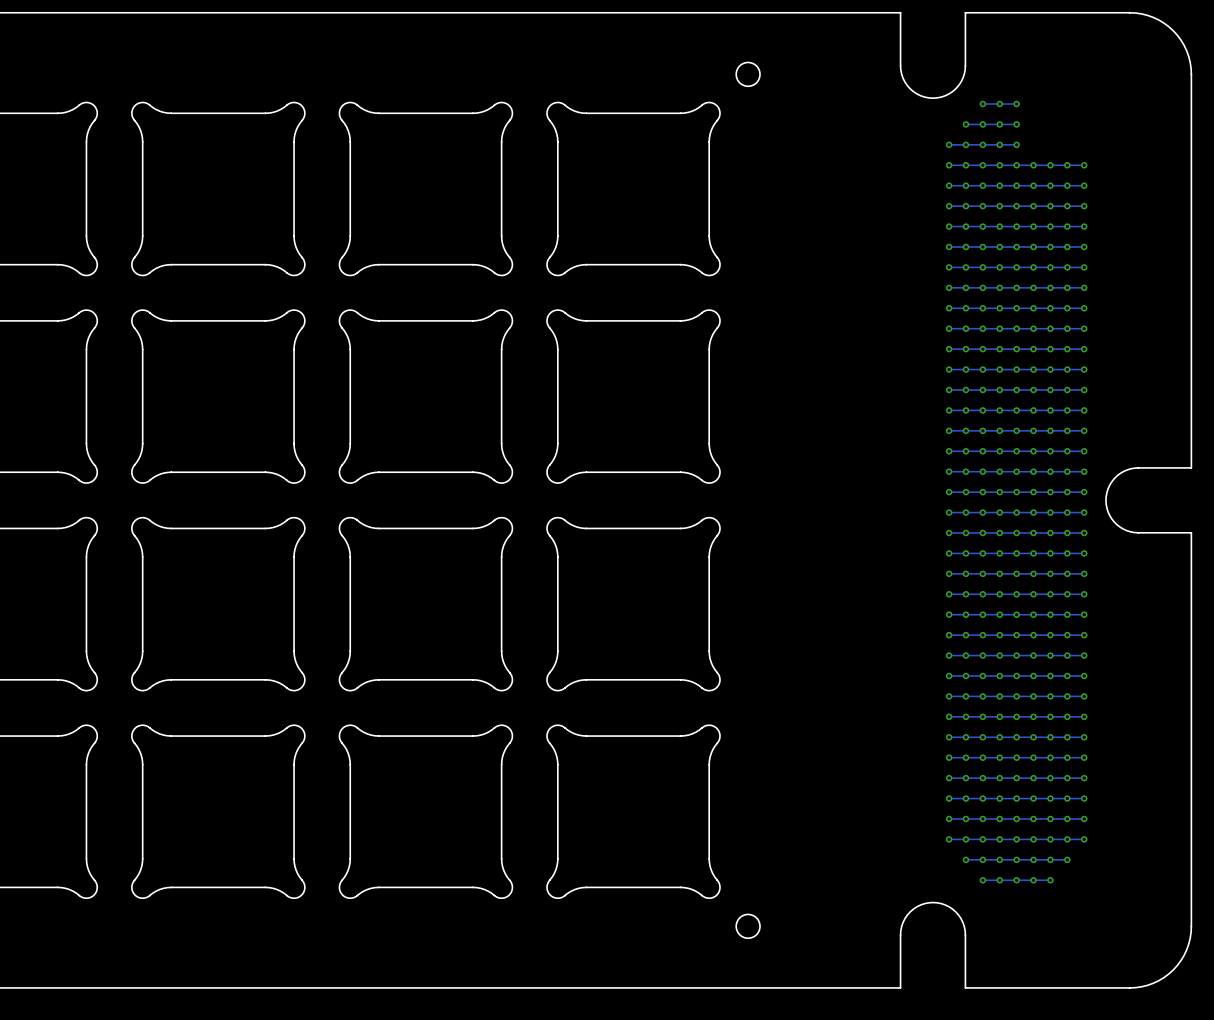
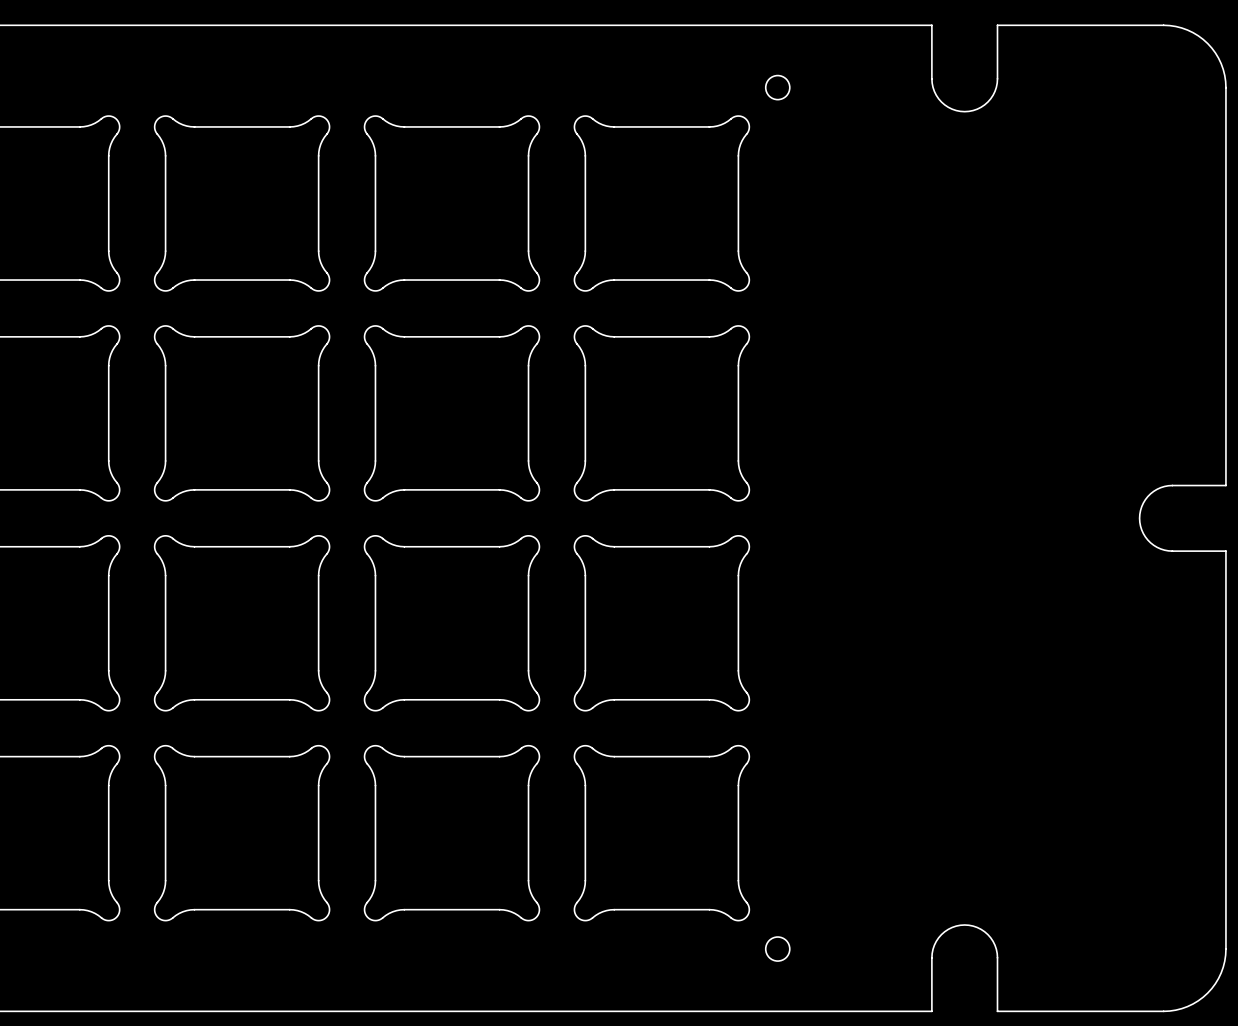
via: (982, 104) -> none
via: (999, 104) -> none
track: (1016, 104) (982, 104) -> none
via: (1016, 104) -> none
via: (965, 124) -> none
via: (982, 124) -> none
via: (999, 124) -> none
track: (1016, 124) (965, 124) -> none
via: (1016, 124) -> none
via: (949, 144) -> none
via: (965, 144) -> none
via: (982, 144) -> none
via: (999, 144) -> none
track: (1016, 144) (949, 144) -> none
via: (1016, 144) -> none
via: (949, 165) -> none
via: (965, 165) -> none
via: (982, 165) -> none
via: (999, 165) -> none
via: (1016, 165) -> none
via: (1033, 165) -> none
via: (1050, 165) -> none
via: (1067, 165) -> none
track: (1084, 165) (949, 165) -> none
via: (1084, 165) -> none
via: (949, 185) -> none
via: (965, 185) -> none
via: (982, 185) -> none
via: (999, 185) -> none
via: (1016, 185) -> none
via: (1033, 185) -> none
via: (1050, 185) -> none
via: (1067, 185) -> none
track: (1084, 185) (949, 185) -> none
via: (1084, 185) -> none
via: (949, 206) -> none
via: (965, 206) -> none
via: (982, 206) -> none
via: (999, 206) -> none
via: (1016, 206) -> none
via: (1033, 206) -> none
via: (1050, 206) -> none
via: (1067, 206) -> none
track: (1084, 206) (949, 206) -> none
via: (1084, 206) -> none
via: (949, 226) -> none
via: (965, 226) -> none
via: (982, 226) -> none
via: (999, 226) -> none
via: (1016, 226) -> none
via: (1033, 226) -> none
via: (1050, 226) -> none
via: (1067, 226) -> none
track: (1084, 226) (949, 226) -> none
via: (1084, 226) -> none
via: (949, 247) -> none
via: (965, 247) -> none
via: (982, 247) -> none
via: (999, 247) -> none
via: (1016, 247) -> none
via: (1033, 247) -> none
via: (1050, 247) -> none
via: (1067, 247) -> none
track: (1084, 247) (949, 247) -> none
via: (1084, 247) -> none
via: (949, 267) -> none
via: (965, 267) -> none
via: (982, 267) -> none
via: (999, 267) -> none
via: (1016, 267) -> none
via: (1033, 267) -> none
via: (1050, 267) -> none
via: (1067, 267) -> none
track: (1084, 267) (949, 267) -> none
via: (1084, 267) -> none
via: (949, 287) -> none
via: (965, 287) -> none
via: (982, 287) -> none
via: (999, 287) -> none
via: (1016, 287) -> none
via: (1033, 287) -> none
via: (1050, 287) -> none
via: (1067, 287) -> none
track: (1084, 287) (949, 287) -> none
via: (1084, 287) -> none
via: (949, 308) -> none
via: (965, 308) -> none
via: (982, 308) -> none
via: (999, 308) -> none
via: (1016, 308) -> none
via: (1033, 308) -> none
via: (1050, 308) -> none
via: (1067, 308) -> none
track: (1084, 308) (949, 308) -> none
via: (1084, 308) -> none
via: (949, 328) -> none
via: (965, 328) -> none
via: (982, 328) -> none
via: (999, 328) -> none
via: (1016, 328) -> none
via: (1033, 328) -> none
via: (1050, 328) -> none
via: (1067, 328) -> none
track: (1084, 328) (949, 328) -> none
via: (1084, 328) -> none
via: (949, 349) -> none
via: (965, 349) -> none
via: (982, 349) -> none
via: (999, 349) -> none
via: (1016, 349) -> none
via: (1033, 349) -> none
via: (1050, 349) -> none
via: (1067, 349) -> none
track: (1084, 349) (949, 349) -> none
via: (1084, 349) -> none
via: (949, 369) -> none
via: (965, 369) -> none
via: (982, 369) -> none
via: (999, 369) -> none
via: (1016, 369) -> none
via: (1033, 369) -> none
via: (1050, 369) -> none
via: (1067, 369) -> none
track: (1084, 369) (949, 369) -> none
via: (1084, 369) -> none
via: (949, 389) -> none
via: (965, 389) -> none
via: (982, 389) -> none
via: (999, 389) -> none
via: (1016, 389) -> none
via: (1033, 389) -> none
via: (1050, 389) -> none
via: (1067, 389) -> none
track: (1084, 389) (949, 389) -> none
via: (1084, 389) -> none
via: (949, 410) -> none
via: (965, 410) -> none
via: (982, 410) -> none
via: (999, 410) -> none
via: (1016, 410) -> none
via: (1033, 410) -> none
via: (1050, 410) -> none
via: (1067, 410) -> none
track: (1084, 410) (949, 410) -> none
via: (1084, 410) -> none
via: (949, 430) -> none
via: (965, 430) -> none
via: (982, 430) -> none
via: (999, 430) -> none
via: (1016, 430) -> none
via: (1033, 430) -> none
via: (1050, 430) -> none
via: (1067, 430) -> none
track: (1084, 430) (949, 430) -> none
via: (1084, 430) -> none
via: (949, 451) -> none
via: (965, 451) -> none
via: (982, 451) -> none
via: (999, 451) -> none
via: (1016, 451) -> none
via: (1033, 451) -> none
via: (1050, 451) -> none
via: (1067, 451) -> none
track: (1084, 451) (949, 451) -> none
via: (1084, 451) -> none
via: (949, 471) -> none
via: (965, 471) -> none
via: (982, 471) -> none
via: (999, 471) -> none
via: (1016, 471) -> none
via: (1033, 471) -> none
via: (1050, 471) -> none
via: (1067, 471) -> none
track: (1084, 471) (949, 471) -> none
via: (1084, 471) -> none
via: (949, 492) -> none
via: (965, 492) -> none
via: (982, 492) -> none
via: (999, 492) -> none
via: (1016, 492) -> none
via: (1033, 492) -> none
via: (1050, 492) -> none
via: (1067, 492) -> none
track: (1084, 492) (949, 492) -> none
via: (1084, 492) -> none
via: (949, 512) -> none
via: (965, 512) -> none
via: (982, 512) -> none
via: (999, 512) -> none
via: (1016, 512) -> none
via: (1033, 512) -> none
via: (1050, 512) -> none
via: (1067, 512) -> none
track: (1084, 512) (949, 512) -> none
via: (1084, 512) -> none
via: (949, 532) -> none
via: (965, 532) -> none
via: (982, 532) -> none
via: (999, 532) -> none
via: (1016, 532) -> none
via: (1033, 532) -> none
via: (1050, 532) -> none
via: (1067, 532) -> none
track: (1084, 532) (949, 532) -> none
via: (1084, 532) -> none
via: (949, 553) -> none
via: (965, 553) -> none
via: (982, 553) -> none
via: (999, 553) -> none
via: (1016, 553) -> none
via: (1033, 553) -> none
via: (1050, 553) -> none
via: (1067, 553) -> none
track: (1084, 553) (949, 553) -> none
via: (1084, 553) -> none
via: (949, 573) -> none
via: (965, 573) -> none
via: (982, 573) -> none
via: (999, 573) -> none
via: (1016, 573) -> none
via: (1033, 573) -> none
via: (1050, 573) -> none
via: (1067, 573) -> none
track: (1084, 573) (949, 573) -> none
via: (1084, 573) -> none
via: (949, 594) -> none
via: (965, 594) -> none
via: (982, 594) -> none
via: (999, 594) -> none
via: (1016, 594) -> none
via: (1033, 594) -> none
via: (1050, 594) -> none
via: (1067, 594) -> none
track: (1084, 594) (949, 594) -> none
via: (1084, 594) -> none
via: (949, 614) -> none
via: (965, 614) -> none
via: (982, 614) -> none
via: (999, 614) -> none
via: (1016, 614) -> none
via: (1033, 614) -> none
via: (1050, 614) -> none
via: (1067, 614) -> none
track: (1084, 614) (949, 614) -> none
via: (1084, 614) -> none
via: (949, 635) -> none
via: (965, 635) -> none
via: (982, 635) -> none
via: (999, 635) -> none
via: (1016, 635) -> none
via: (1033, 635) -> none
via: (1050, 635) -> none
via: (1067, 635) -> none
track: (1084, 635) (949, 635) -> none
via: (1084, 635) -> none
via: (949, 655) -> none
via: (965, 655) -> none
via: (982, 655) -> none
via: (999, 655) -> none
via: (1016, 655) -> none
via: (1033, 655) -> none
via: (1050, 655) -> none
via: (1067, 655) -> none
track: (1084, 655) (949, 655) -> none
via: (1084, 655) -> none
via: (949, 675) -> none
via: (965, 675) -> none
via: (982, 675) -> none
via: (999, 675) -> none
via: (1016, 675) -> none
via: (1033, 675) -> none
via: (1050, 675) -> none
via: (1067, 675) -> none
track: (1084, 675) (949, 675) -> none
via: (1084, 675) -> none
via: (949, 696) -> none
via: (965, 696) -> none
via: (982, 696) -> none
via: (999, 696) -> none
via: (1016, 696) -> none
via: (1033, 696) -> none
via: (1050, 696) -> none
via: (1067, 696) -> none
track: (1084, 696) (949, 696) -> none
via: (1084, 696) -> none
via: (949, 716) -> none
via: (965, 716) -> none
via: (982, 716) -> none
via: (999, 716) -> none
via: (1016, 716) -> none
via: (1033, 716) -> none
via: (1050, 716) -> none
via: (1067, 716) -> none
track: (1084, 716) (949, 716) -> none
via: (1084, 716) -> none
via: (949, 737) -> none
via: (965, 737) -> none
via: (982, 737) -> none
via: (999, 737) -> none
via: (1016, 737) -> none
via: (1033, 737) -> none
via: (1050, 737) -> none
via: (1067, 737) -> none
track: (1084, 737) (949, 737) -> none
via: (1084, 737) -> none
via: (949, 757) -> none
via: (965, 757) -> none
via: (982, 757) -> none
via: (999, 757) -> none
via: (1016, 757) -> none
via: (1033, 757) -> none
via: (1050, 757) -> none
via: (1067, 757) -> none
track: (1084, 757) (949, 757) -> none
via: (1084, 757) -> none
via: (949, 778) -> none
via: (965, 778) -> none
via: (982, 778) -> none
via: (999, 778) -> none
via: (1016, 778) -> none
via: (1033, 778) -> none
via: (1050, 778) -> none
via: (1067, 778) -> none
track: (1084, 778) (949, 778) -> none
via: (1084, 778) -> none
via: (949, 798) -> none
via: (965, 798) -> none
via: (982, 798) -> none
via: (999, 798) -> none
via: (1016, 798) -> none
via: (1033, 798) -> none
via: (1050, 798) -> none
via: (1067, 798) -> none
track: (1084, 798) (949, 798) -> none
via: (1084, 798) -> none
via: (949, 818) -> none
via: (965, 818) -> none
via: (982, 818) -> none
via: (999, 818) -> none
via: (1016, 818) -> none
via: (1033, 818) -> none
via: (1050, 818) -> none
via: (1067, 818) -> none
track: (1084, 818) (949, 818) -> none
via: (1084, 818) -> none
via: (949, 839) -> none
via: (965, 839) -> none
via: (982, 839) -> none
via: (999, 839) -> none
via: (1016, 839) -> none
via: (1033, 839) -> none
via: (1050, 839) -> none
via: (1067, 839) -> none
track: (1084, 839) (949, 839) -> none
via: (1084, 839) -> none
via: (965, 859) -> none
via: (982, 859) -> none
via: (999, 859) -> none
via: (1016, 859) -> none
via: (1033, 859) -> none
via: (1050, 859) -> none
track: (1067, 859) (965, 859) -> none
via: (1067, 859) -> none
via: (982, 880) -> none
via: (999, 880) -> none
via: (1016, 880) -> none
via: (1033, 880) -> none
track: (1050, 880) (982, 880) -> none
via: (1050, 880) -> none

